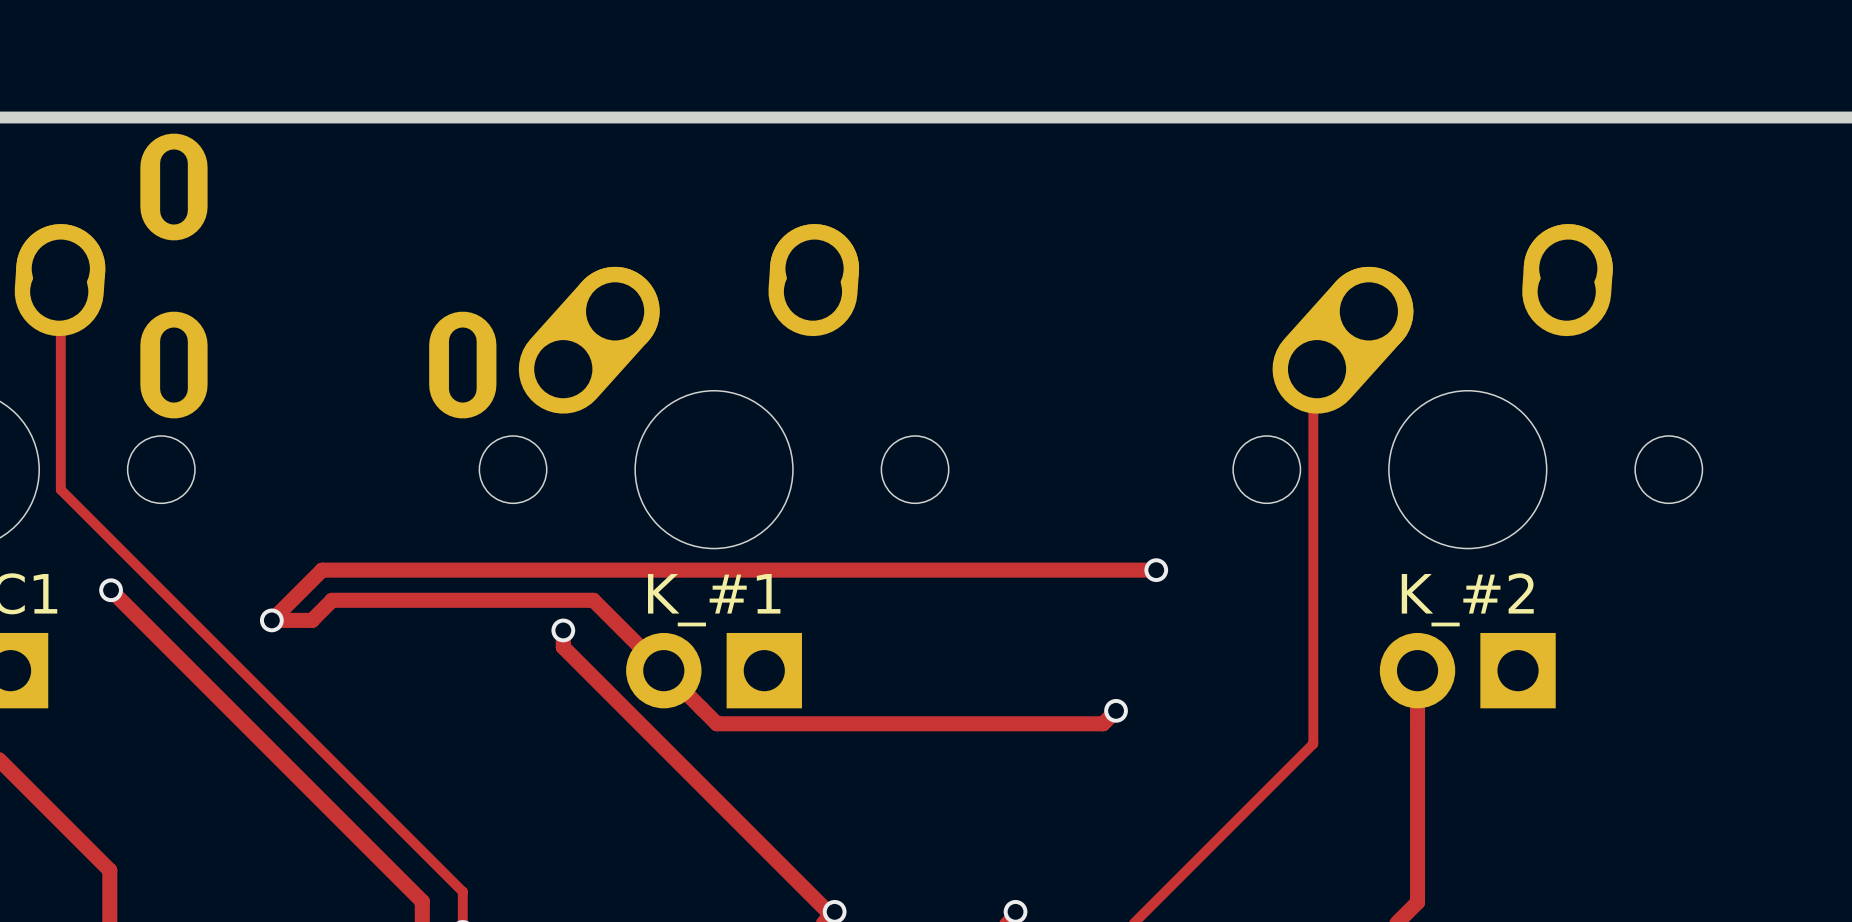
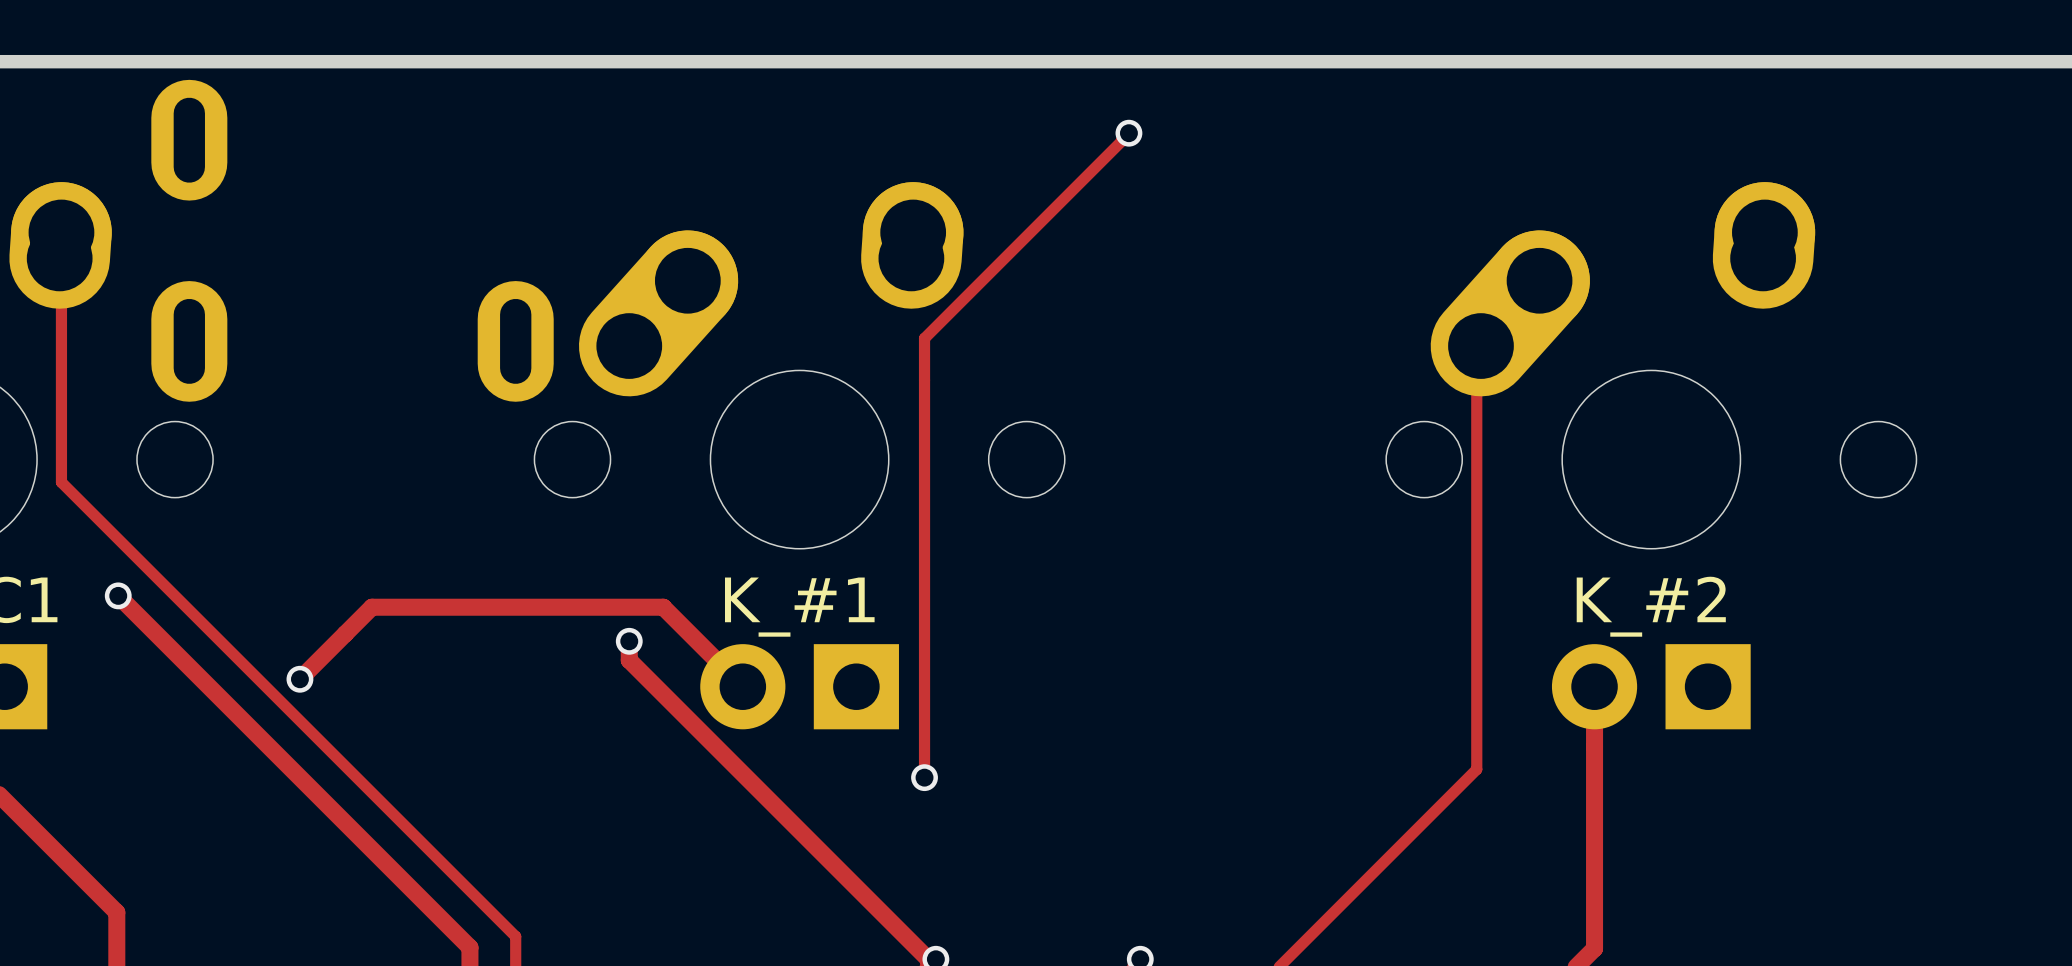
via: none -> (1128, 133)
track: none -> (1121, 141) (924, 338) (924, 777)
track: (1156, 570) (322, 570) (271, 620) (312, 620) (332, 600) (335, 600) -> (299, 679) (371, 607)
via: (1156, 570) -> none
via position: (271, 620) -> (299, 679)
track: (663, 670) (716, 723) (1103, 723) (1116, 710) -> none
via: (1116, 710) -> none
via: none -> (924, 777)

